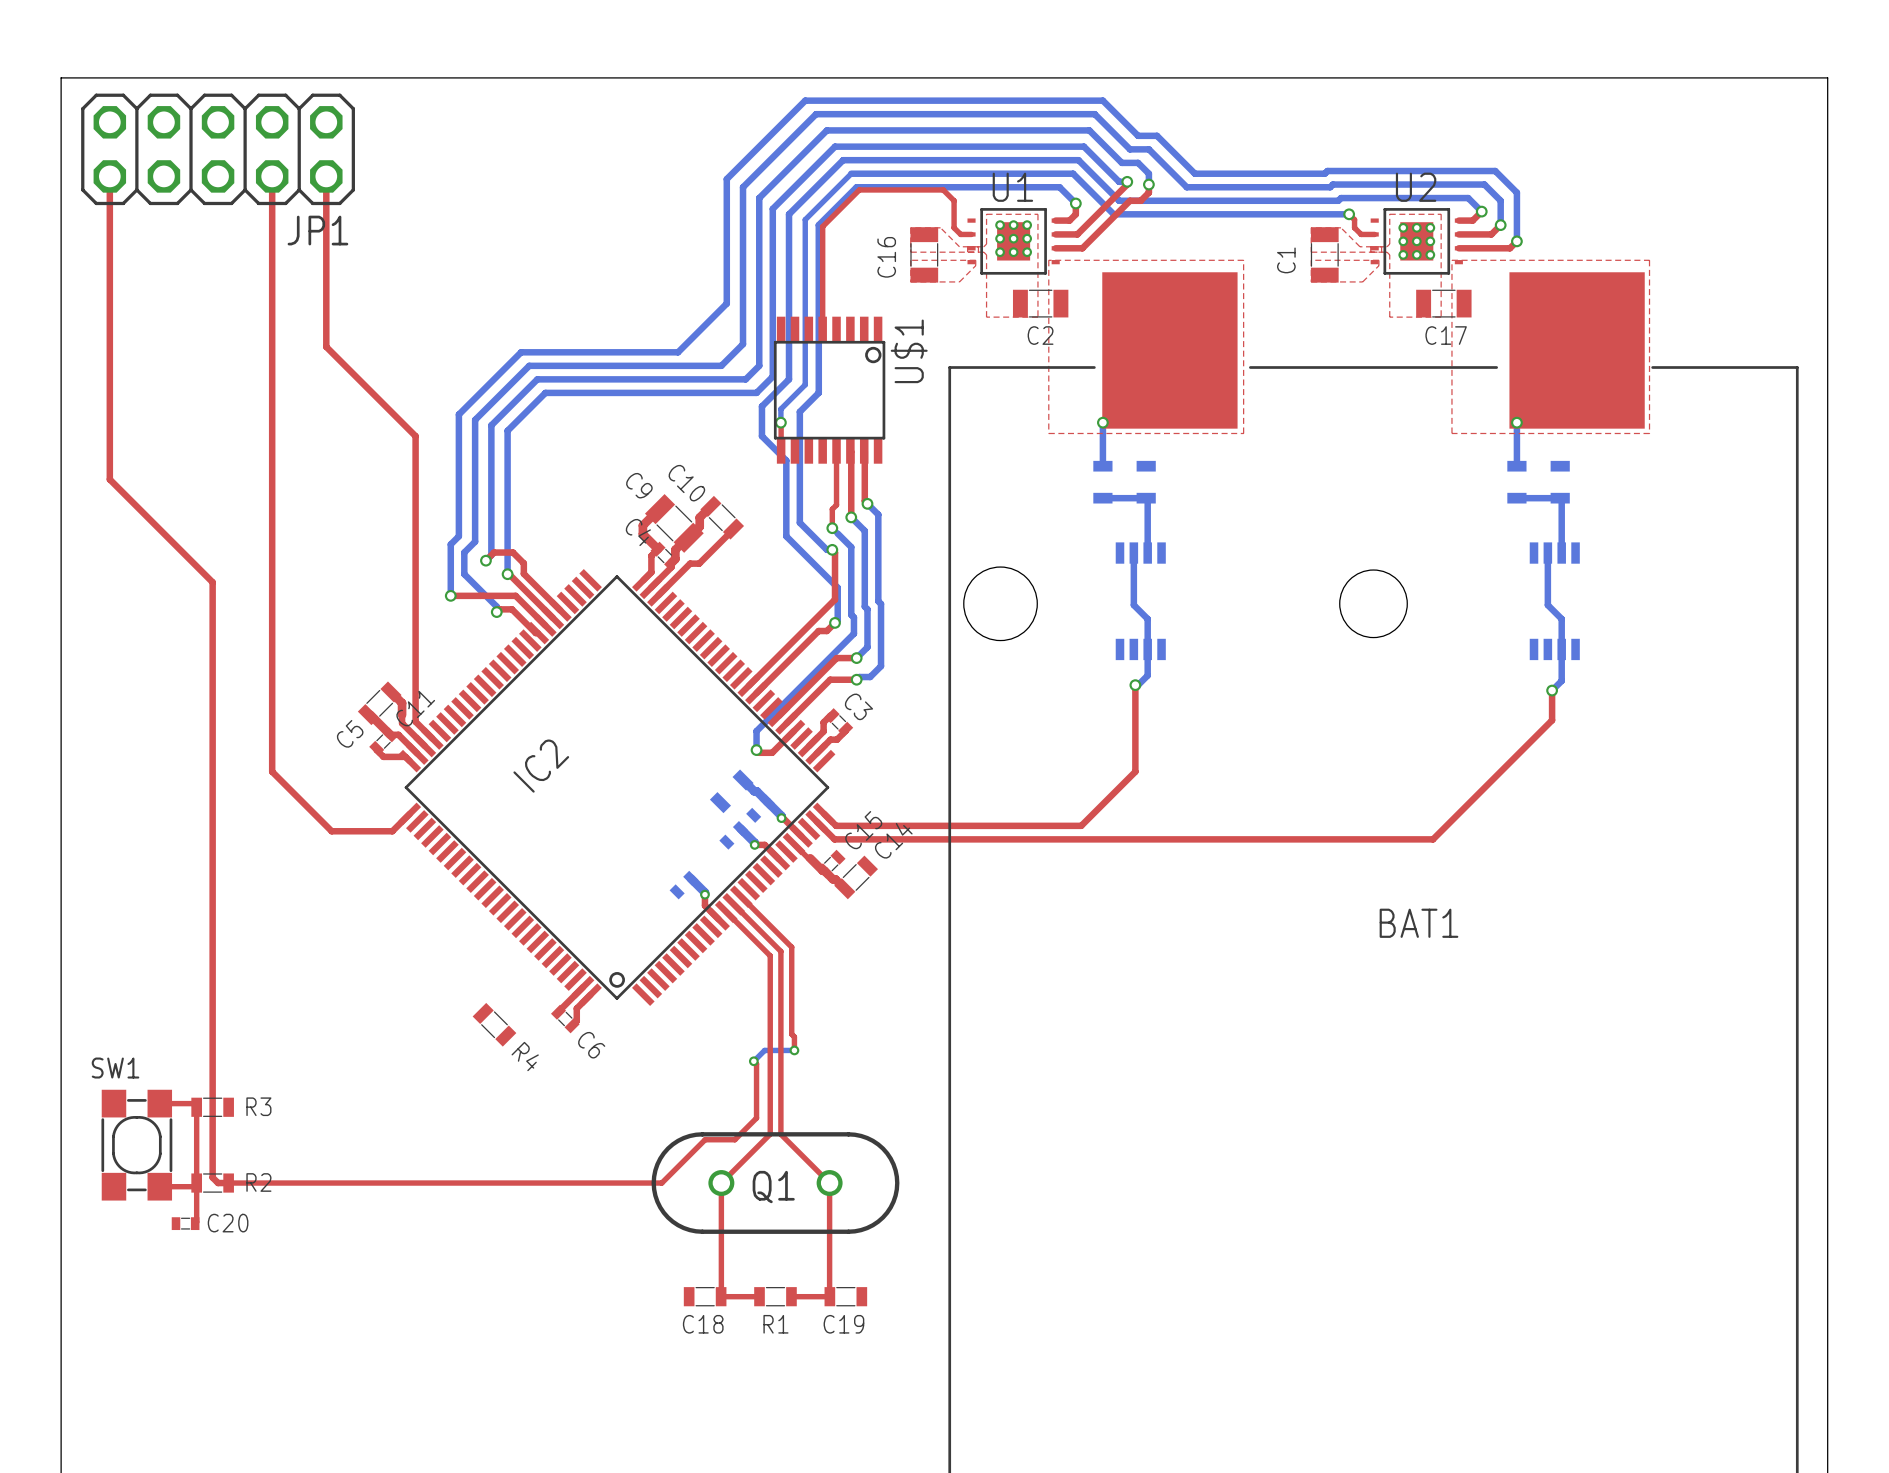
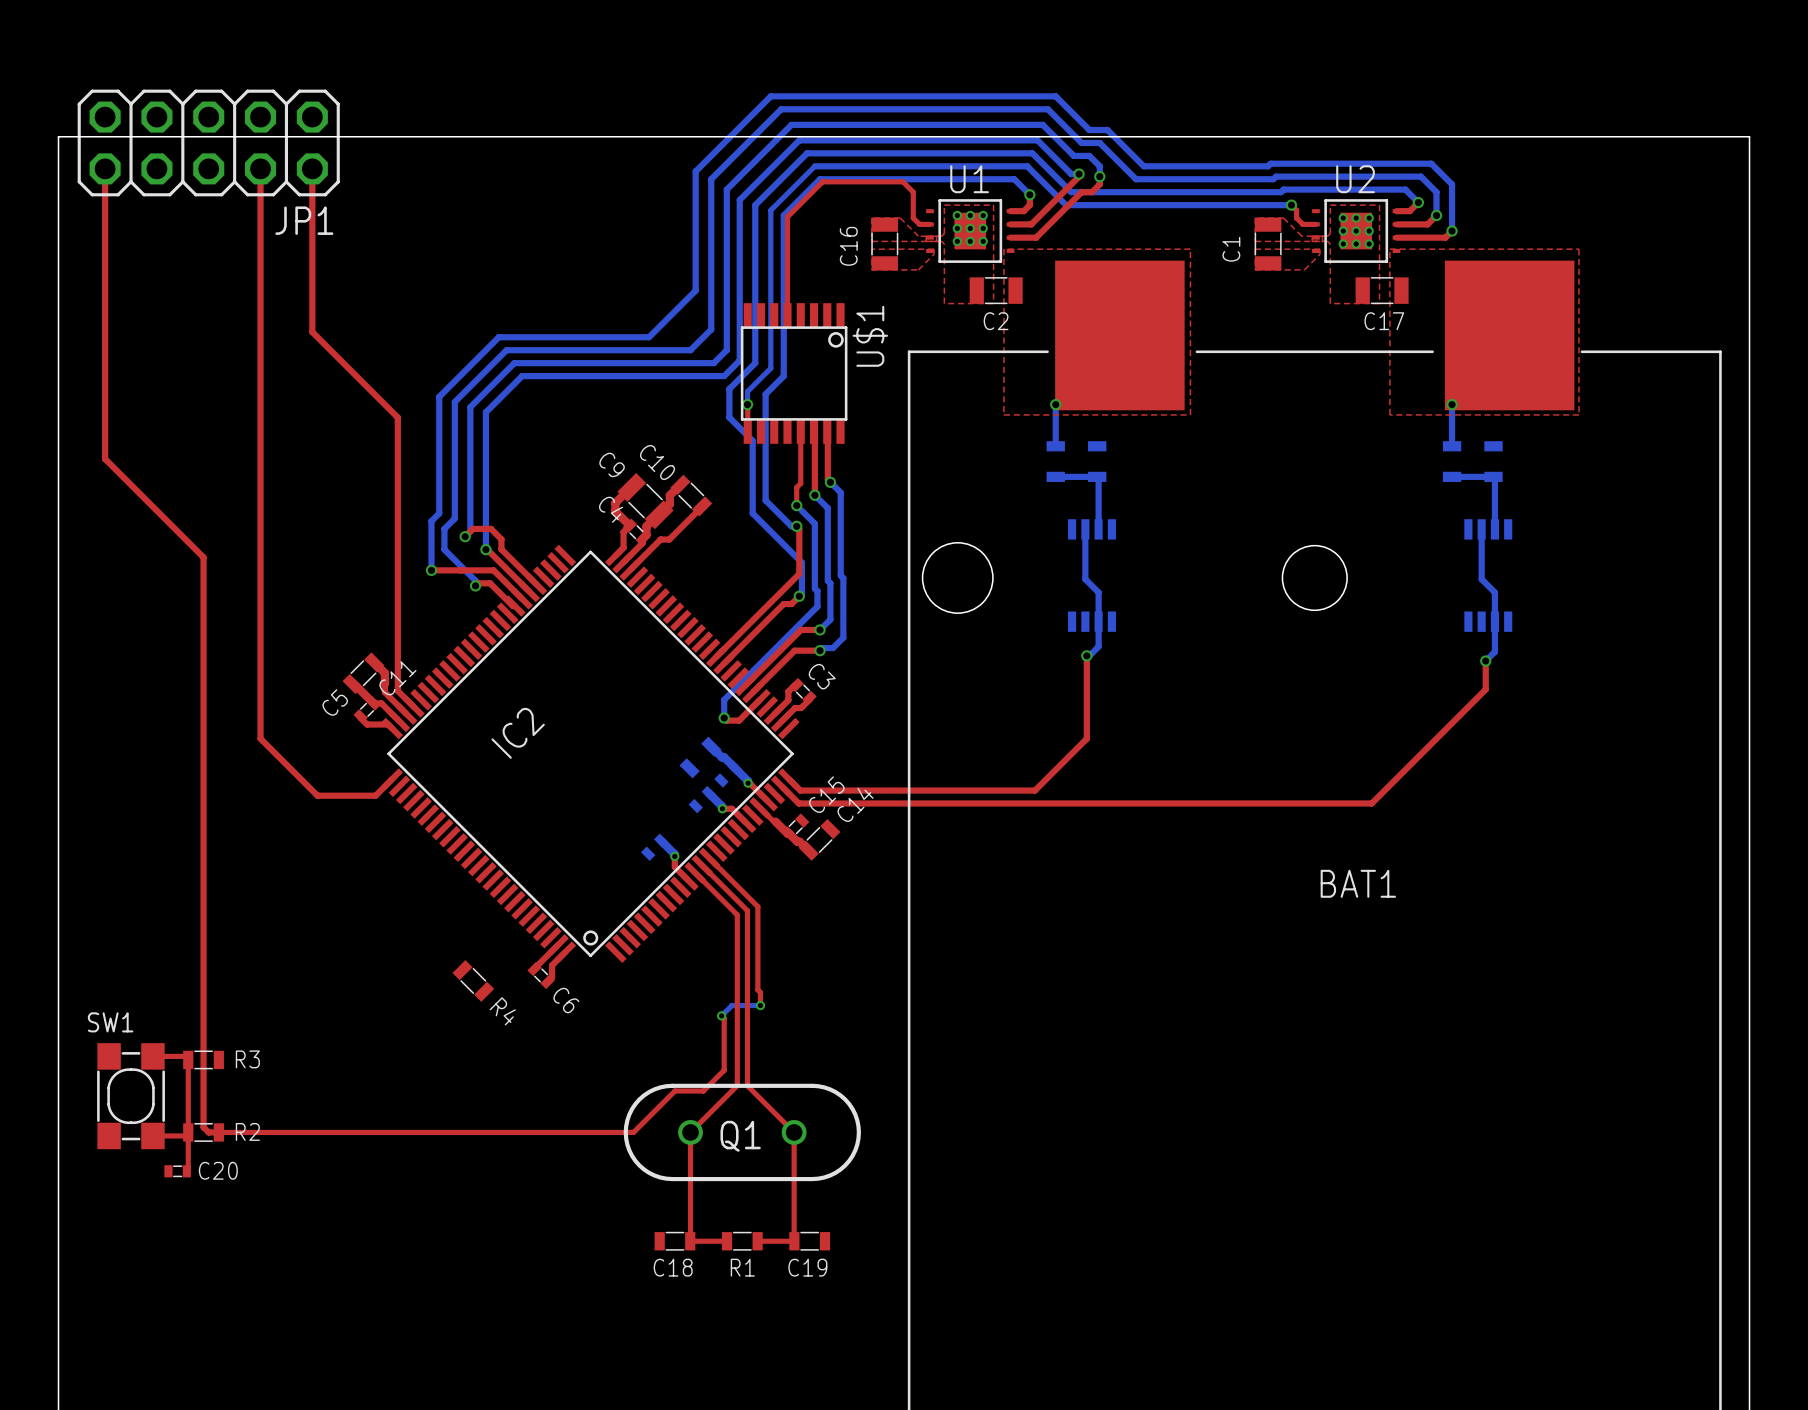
board edge: (61, 142) (61, 77) (1827, 77) (1827, 142) -> (58, 136) (1749, 136)

